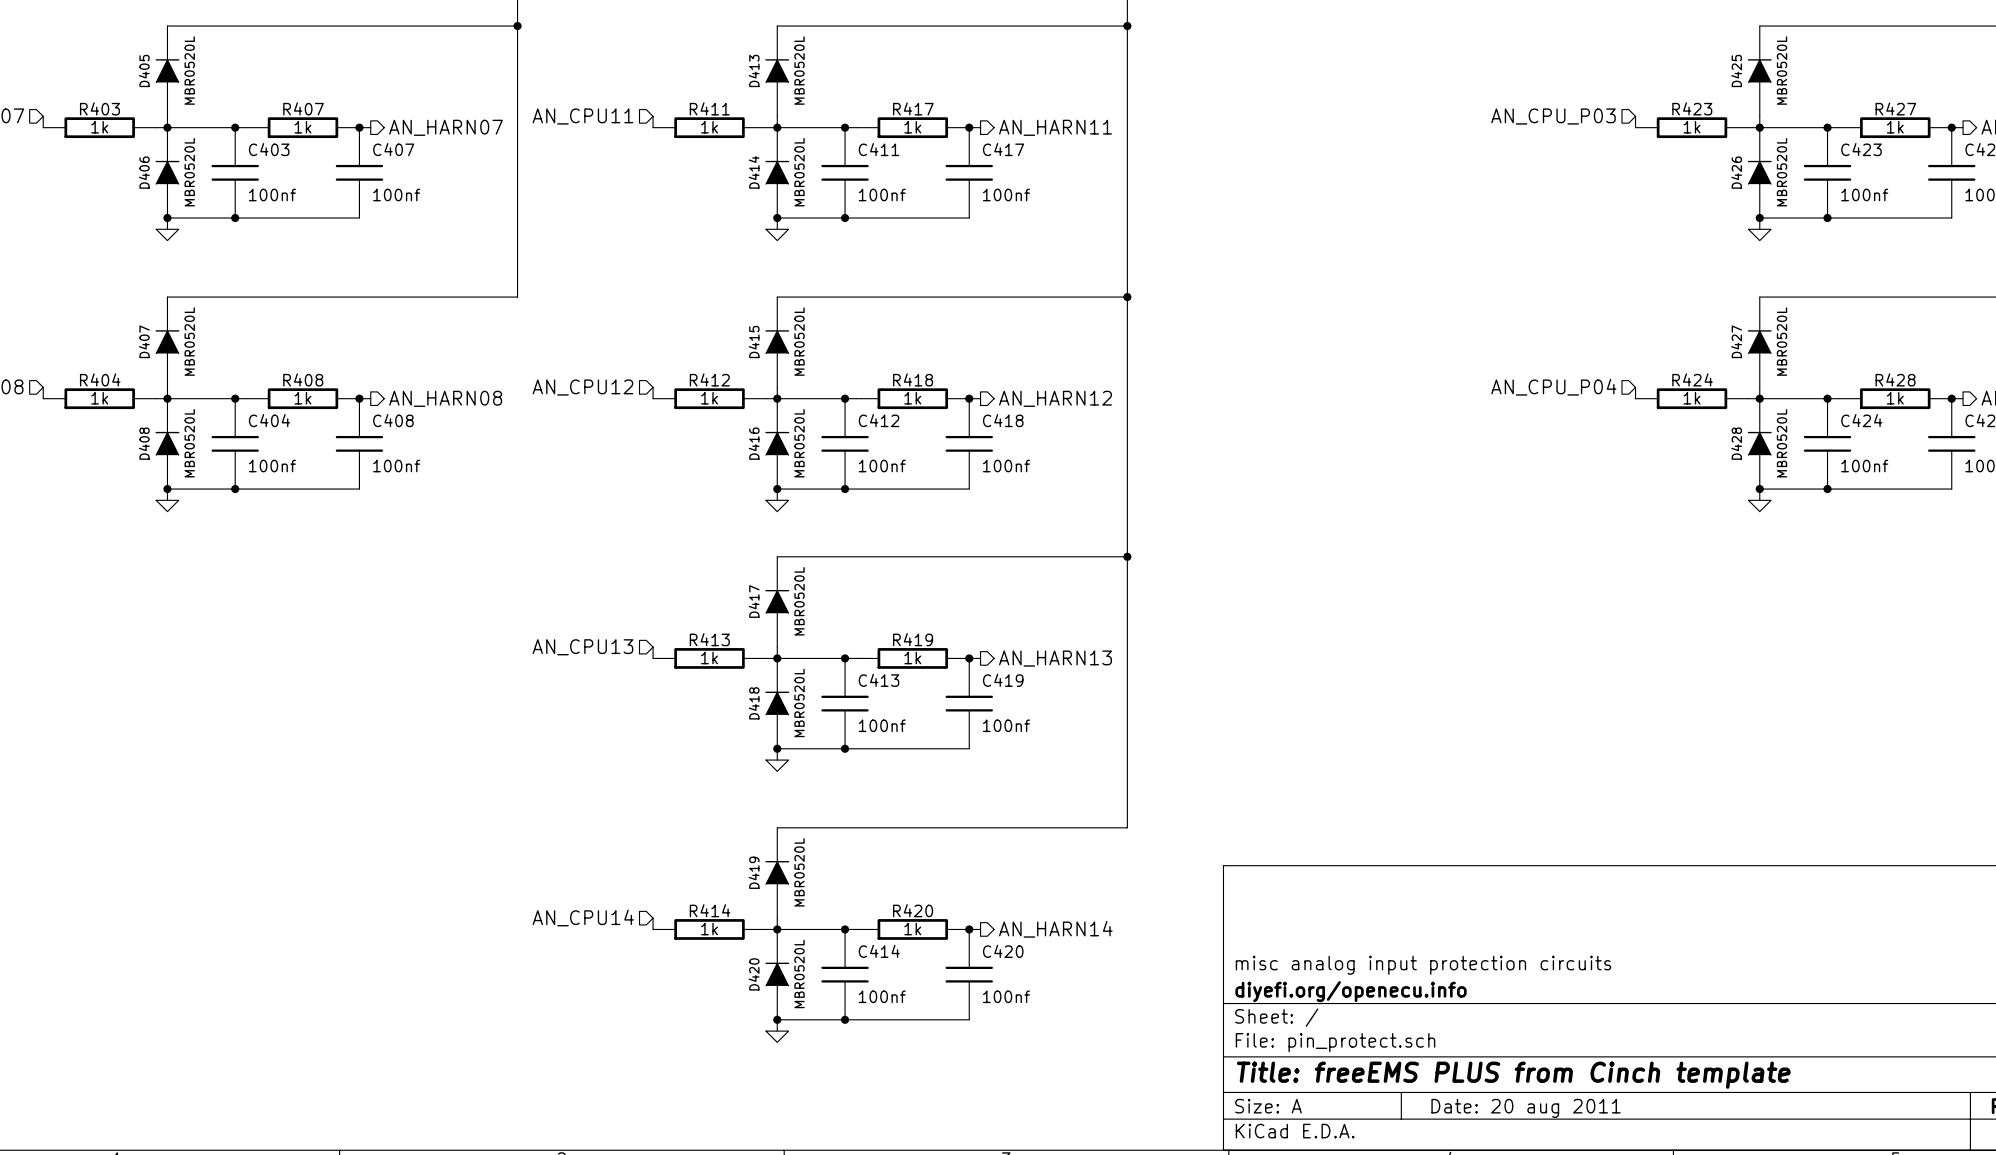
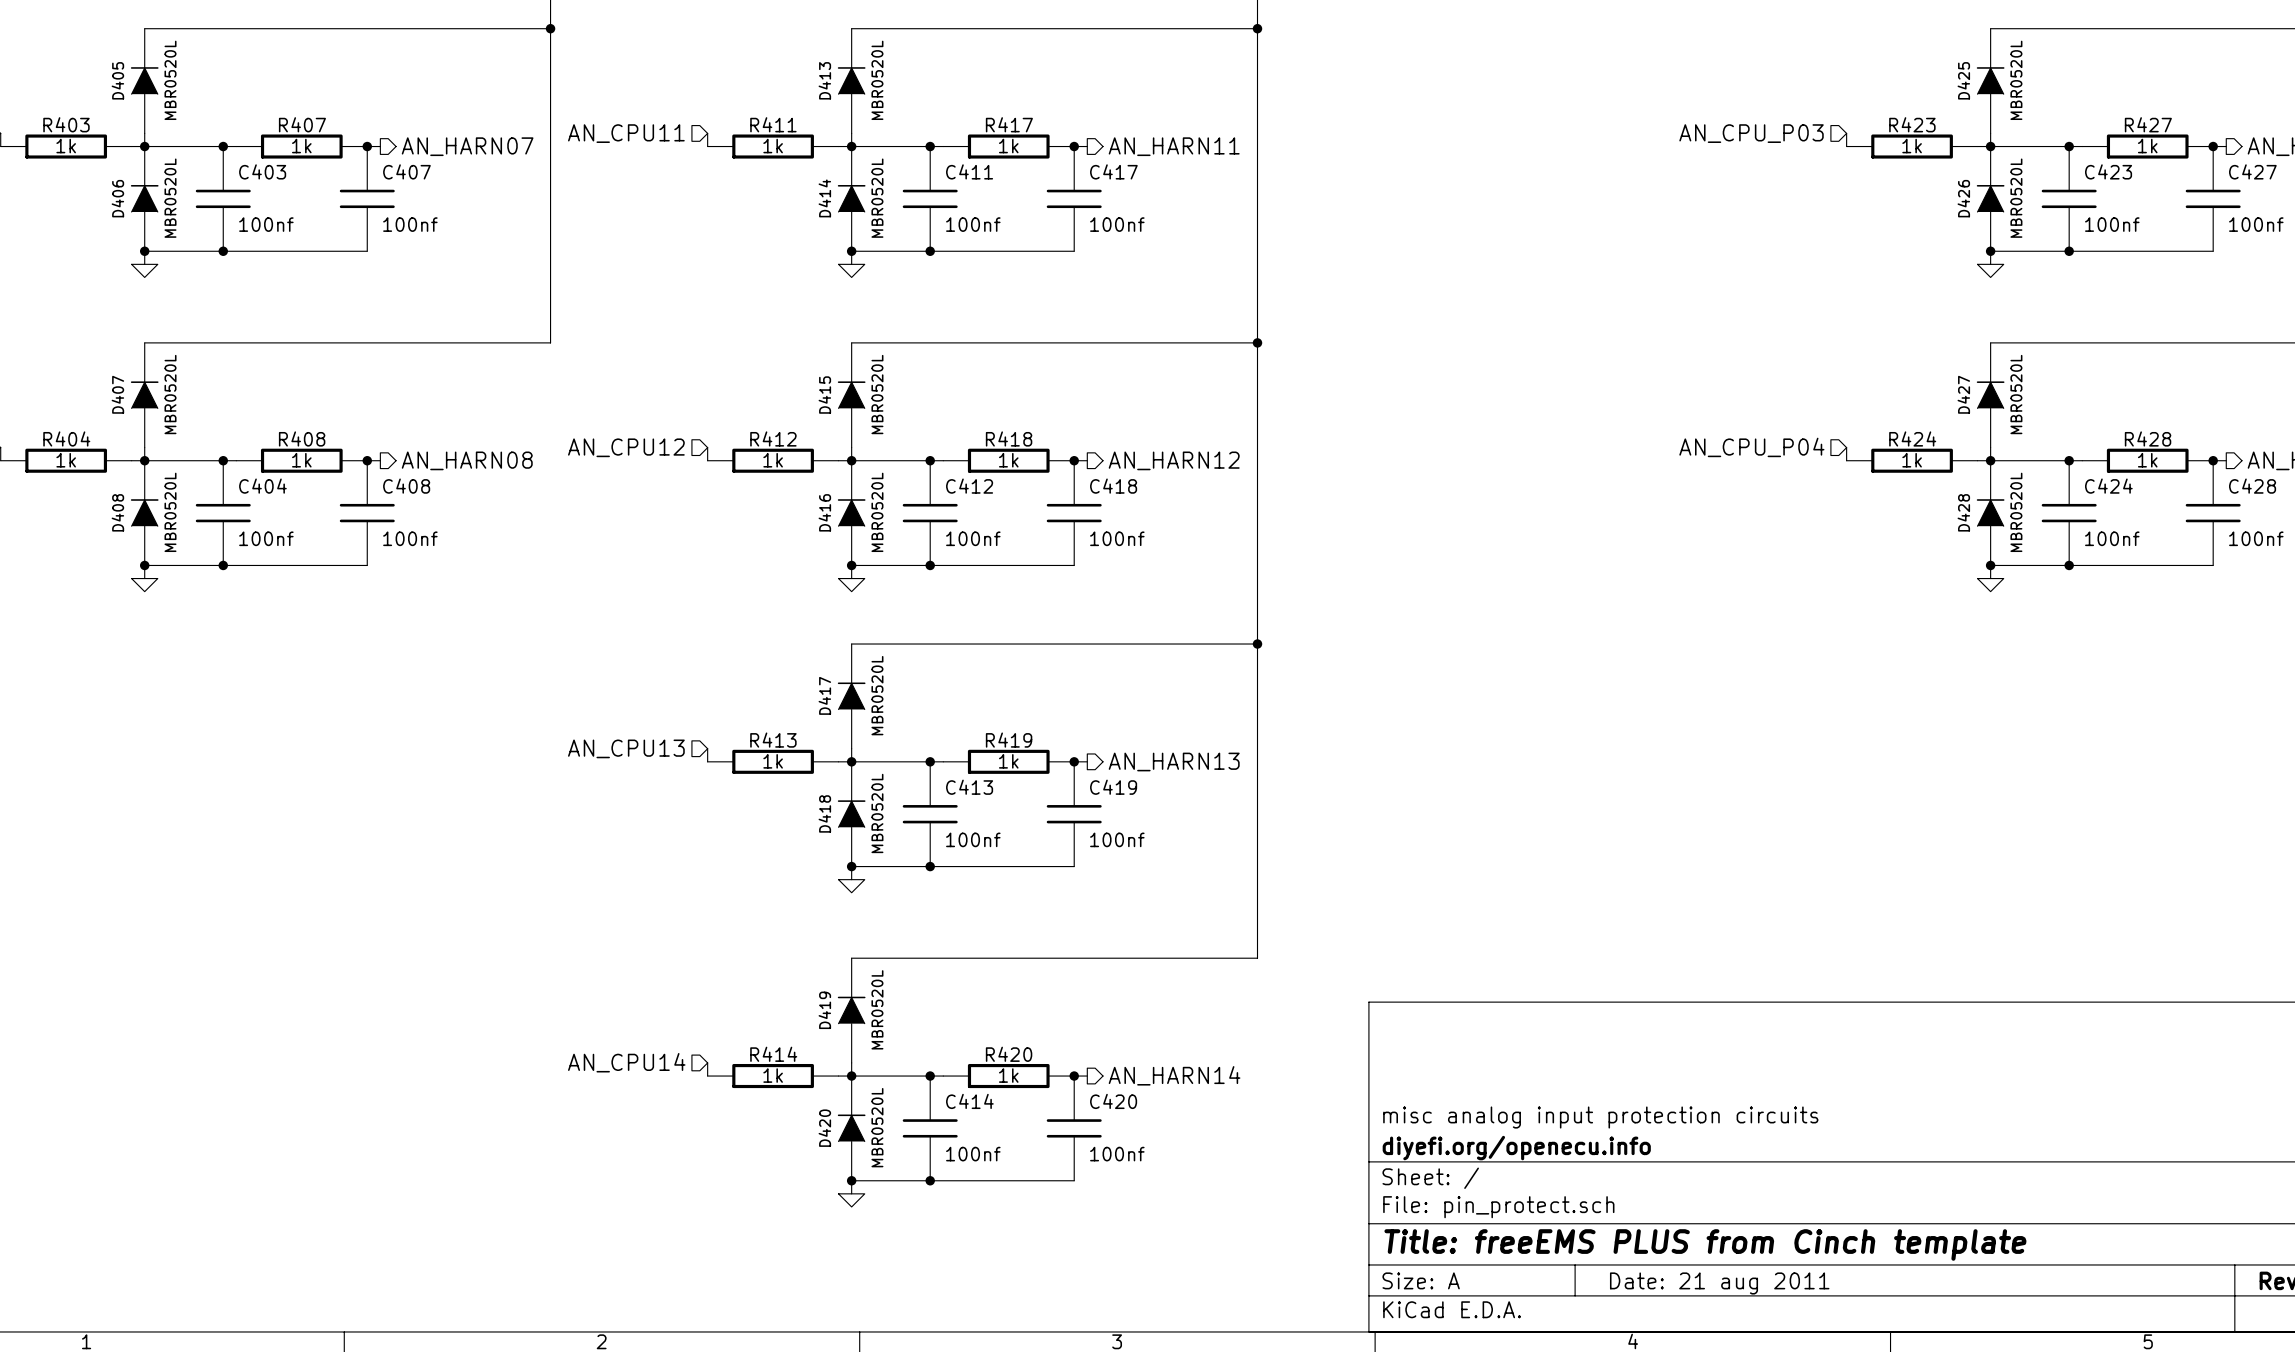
title block: Date: 20 aug 2011 (1526, 1108) -> Date: 21 aug 2011 (1719, 1283)

